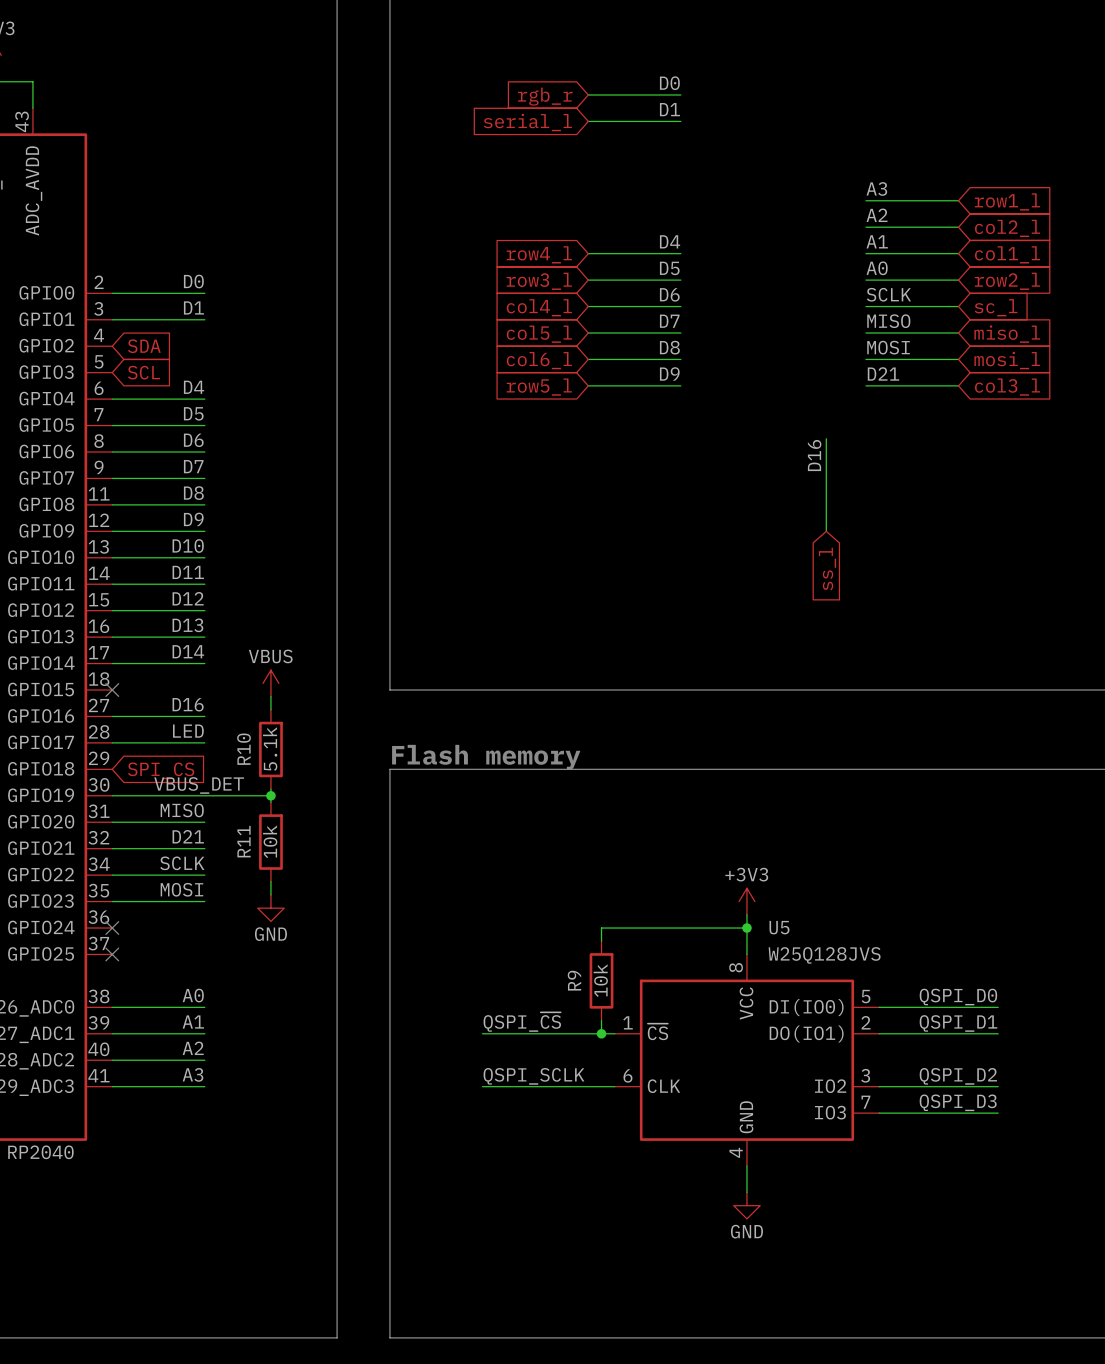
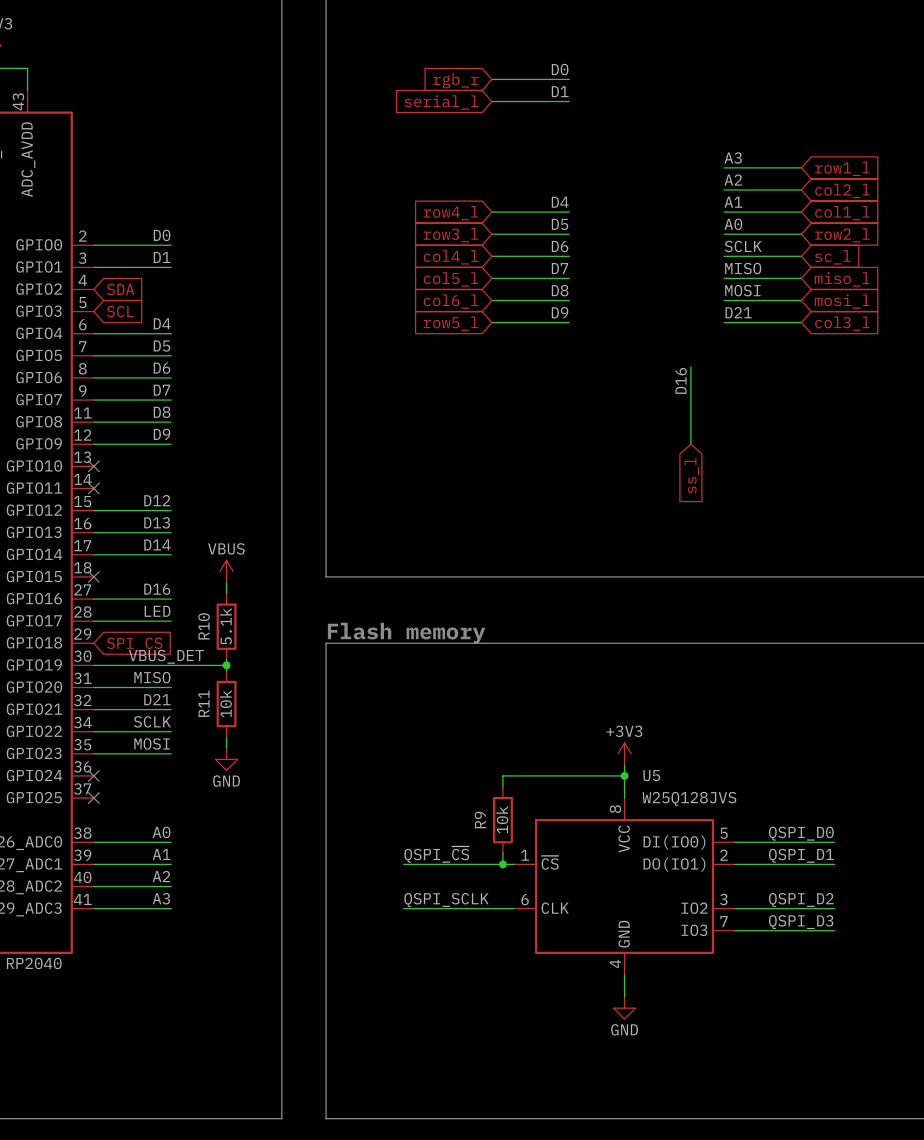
label: D10 (188, 545) -> none
wire: (112, 557) (204, 557) -> none
no-connect mark: none -> (93, 466)
label: D11 (188, 572) -> none
wire: (112, 584) (204, 584) -> none
no-connect mark: none -> (93, 488)

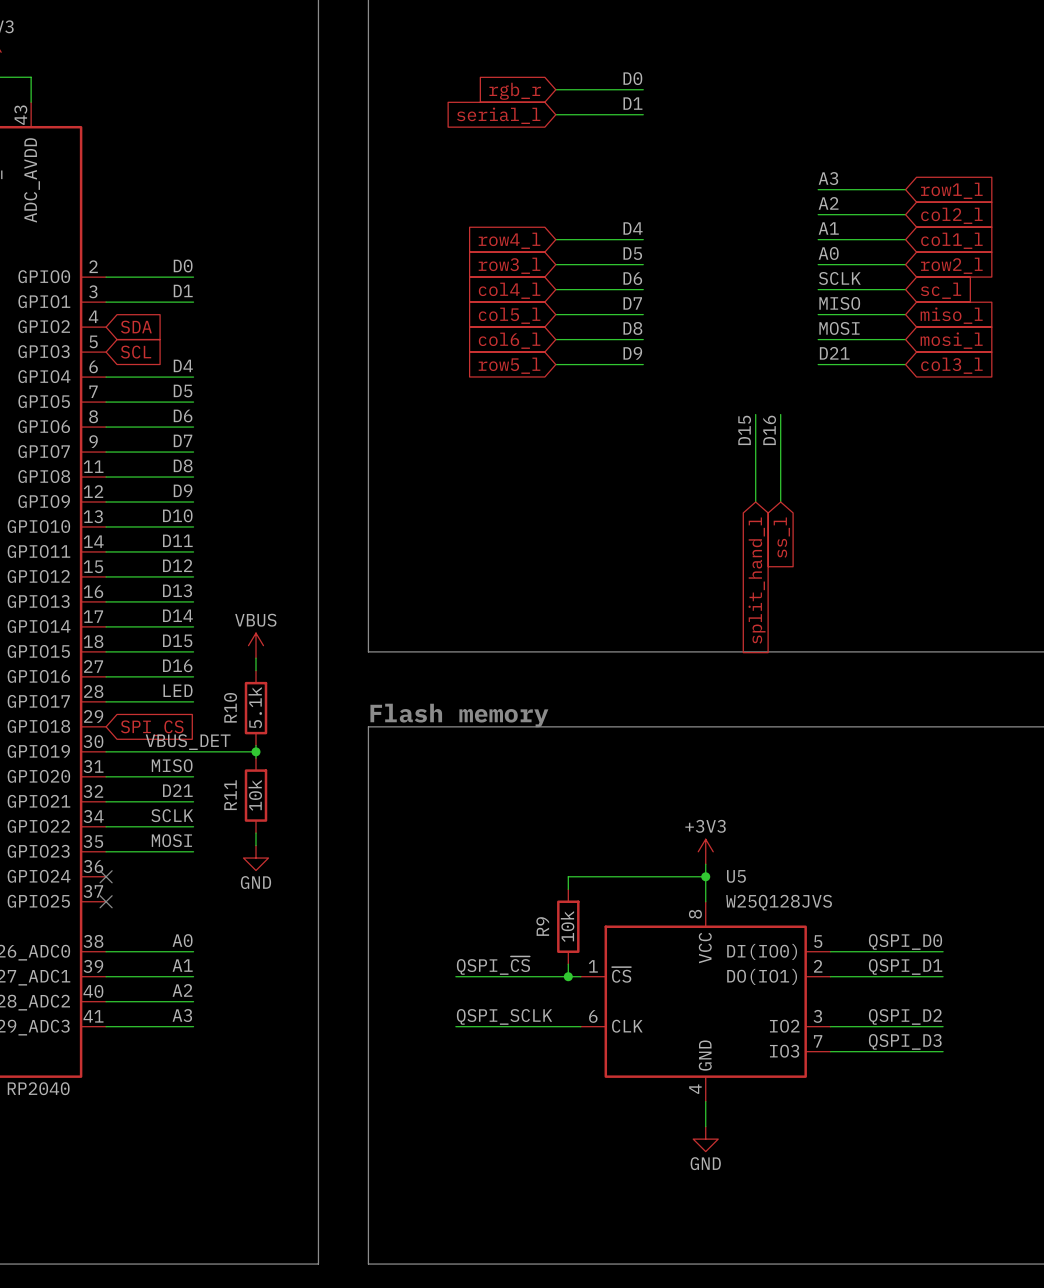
wire: none -> (755, 414) (755, 502)
label: none -> D15 (744, 430)
label: none -> D10 (177, 515)
wire: none -> (106, 526) (193, 526)
no-connect mark: (93, 466) -> none
label: none -> D11 (177, 540)
wire: none -> (106, 551) (193, 551)
no-connect mark: (93, 488) -> none
global label: none -> split_hand_l (757, 580)
label: none -> D15 (177, 640)
wire: none -> (106, 651) (193, 651)
no-connect mark: (93, 576) -> none

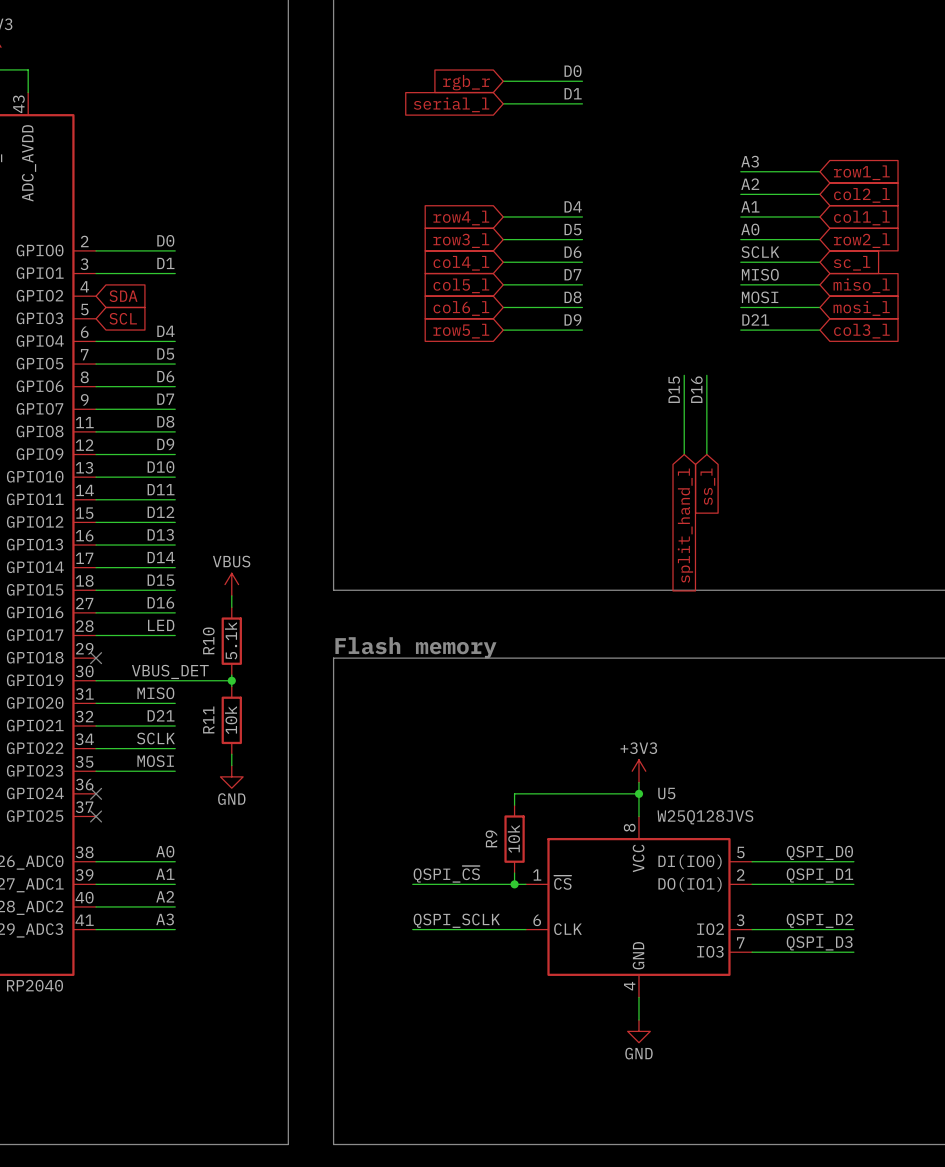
no-connect mark: none -> (96, 658)
global label: SPI_CS (152, 728) -> none

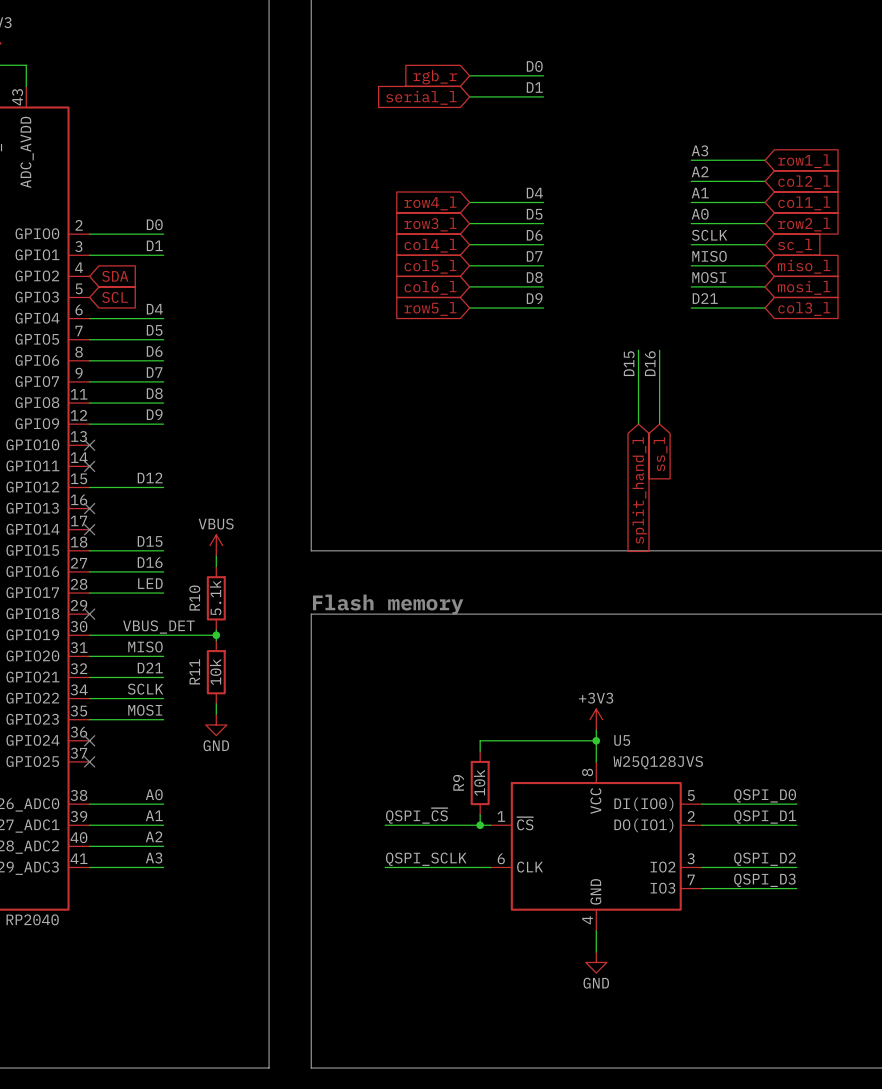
label: D10 (160, 467) -> none
wire: (96, 477) (175, 477) -> none
no-connect mark: none -> (89, 445)
label: D11 (161, 489) -> none
wire: (96, 499) (175, 499) -> none
no-connect mark: none -> (89, 466)
label: D13 (160, 534) -> none
wire: (96, 545) (175, 545) -> none
no-connect mark: none -> (89, 508)
label: D14 (161, 557) -> none
wire: (96, 567) (175, 567) -> none
no-connect mark: none -> (89, 529)

